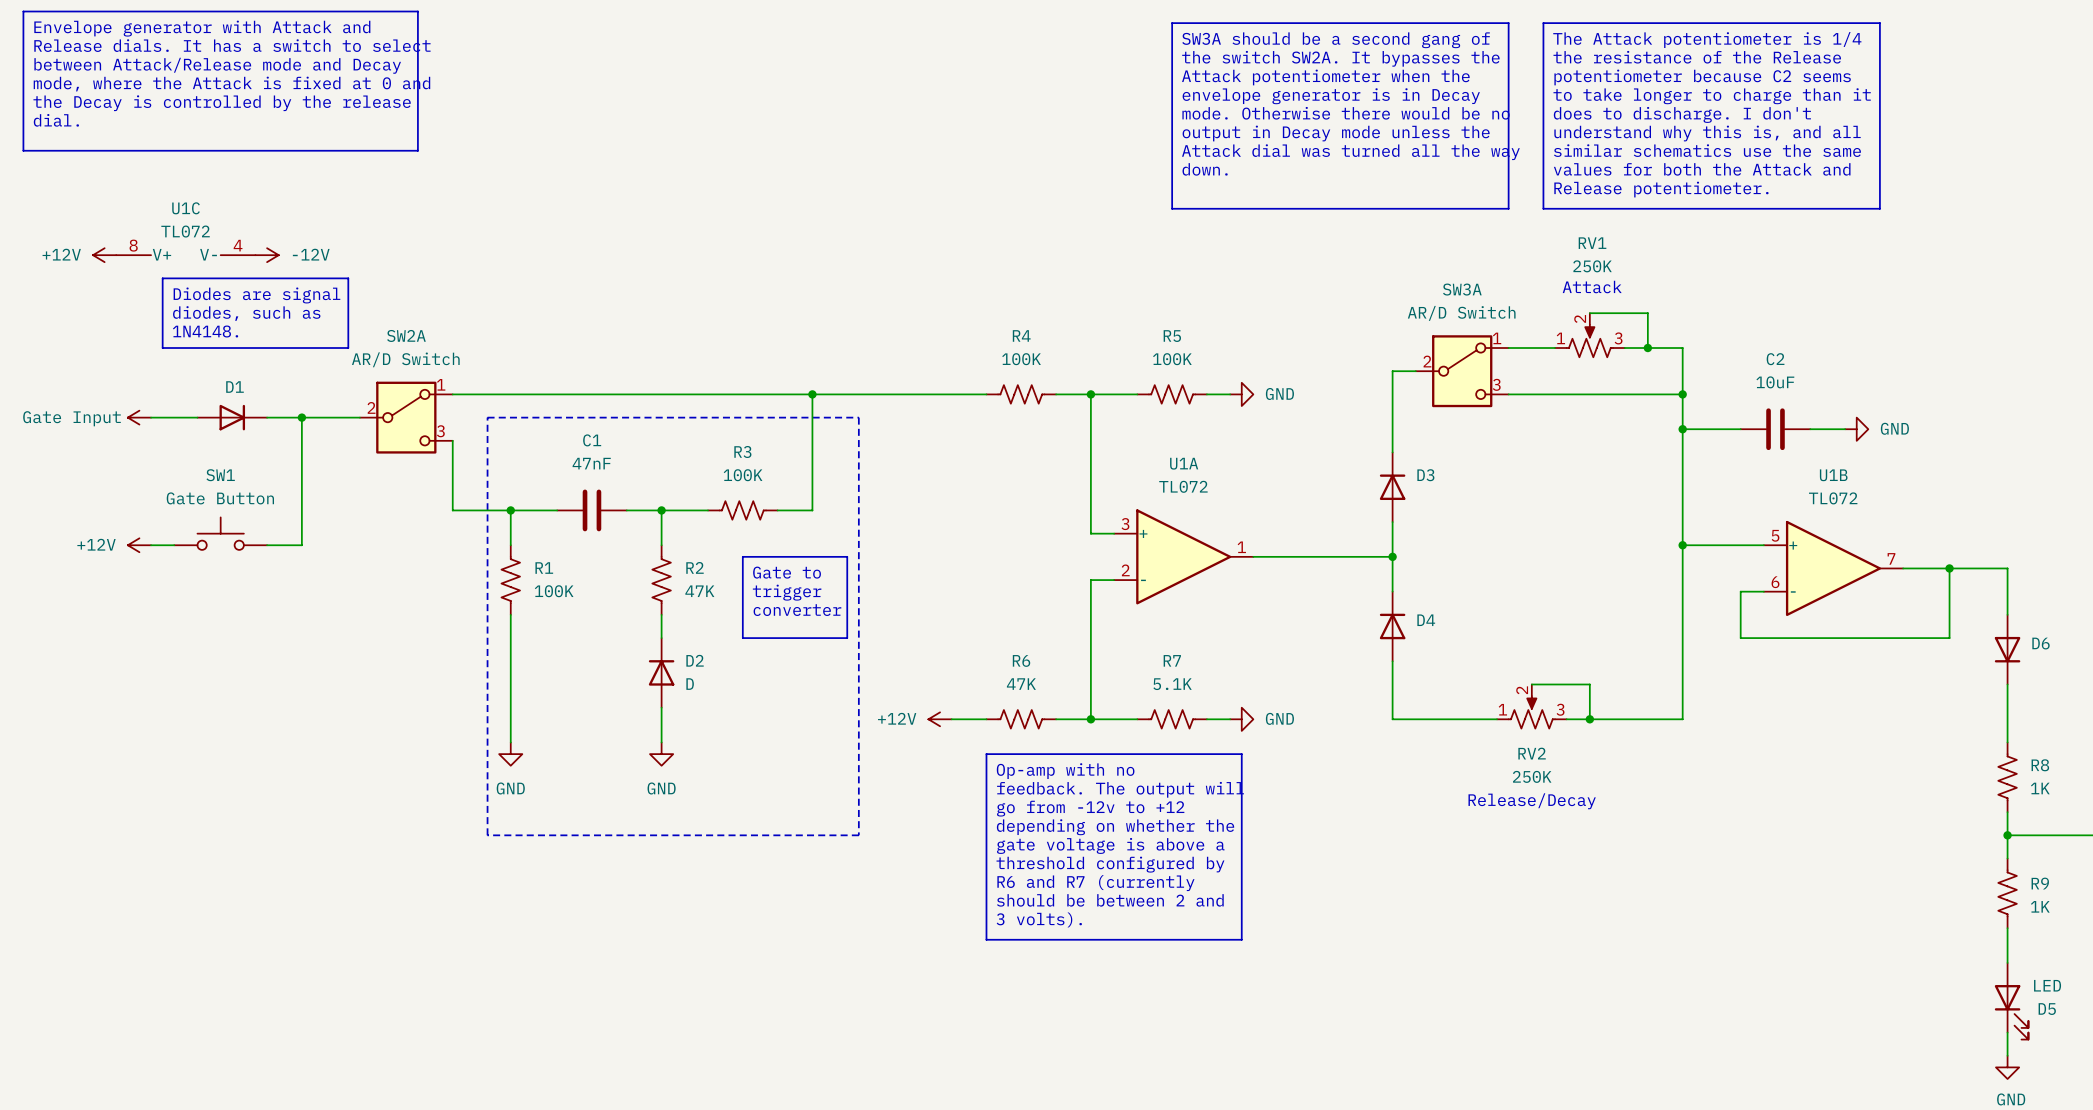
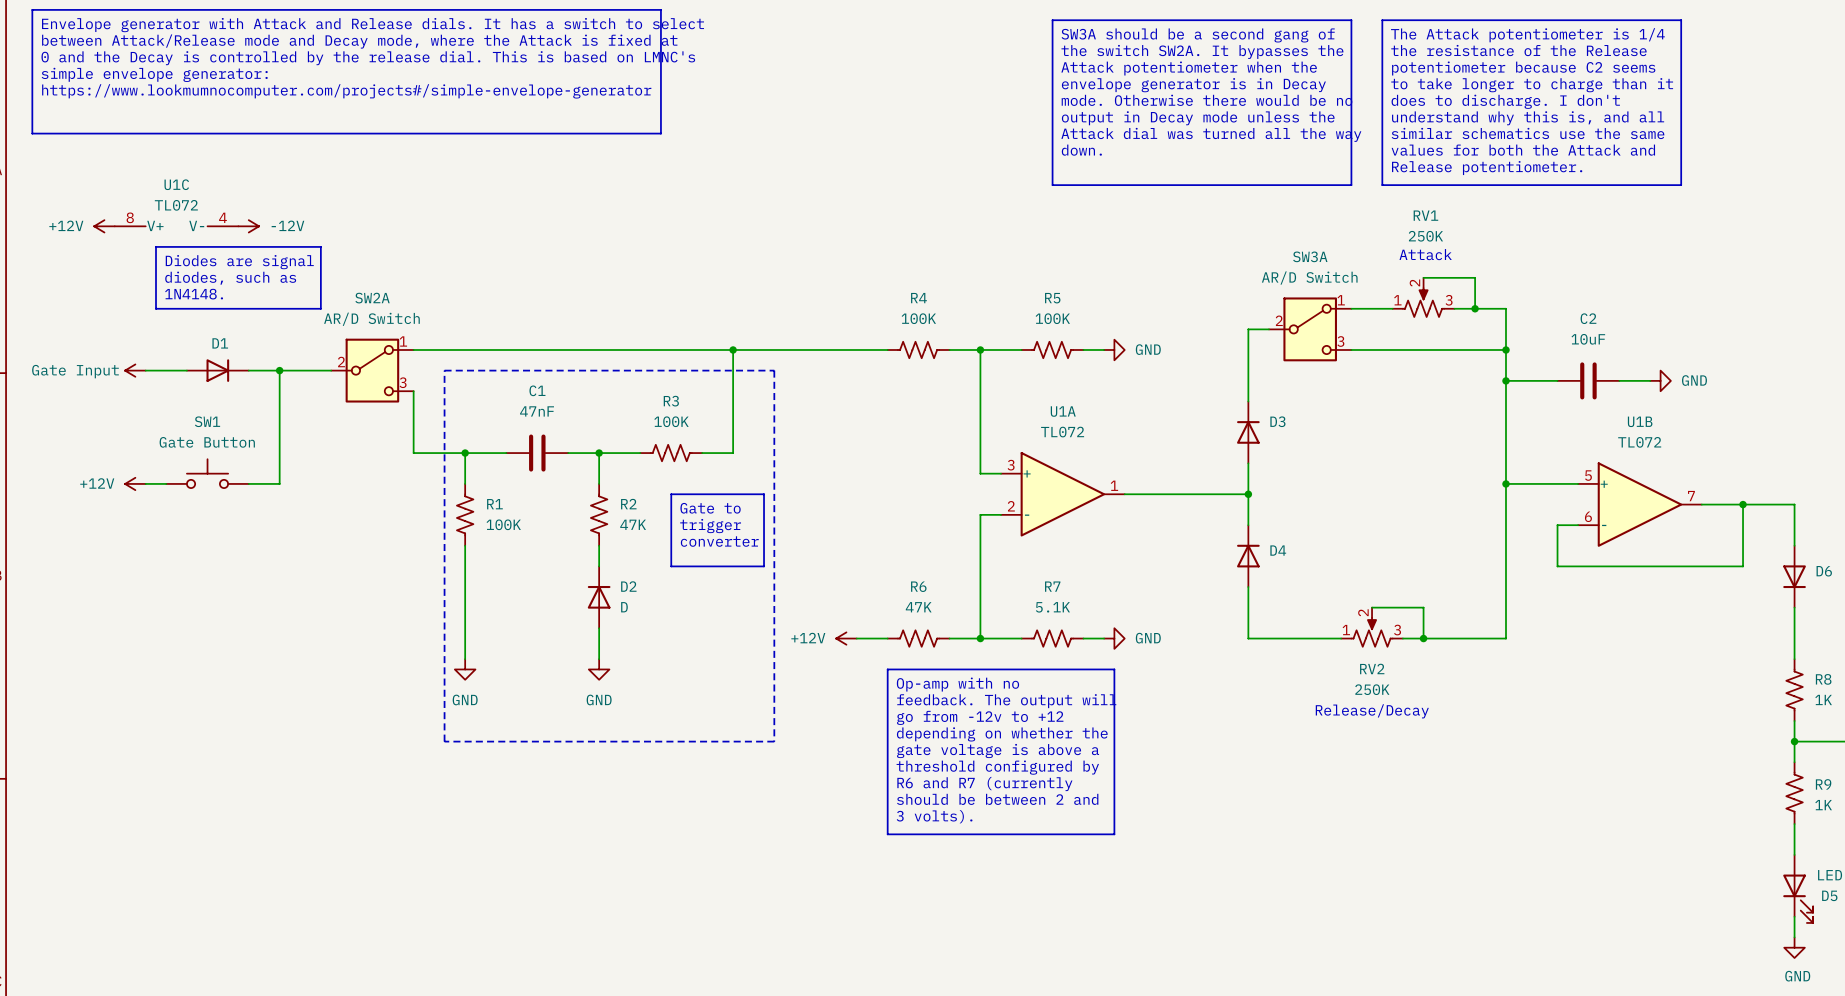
line: (417, 11) (417, 150) -> (382, 9) (660, 9) (660, 133) (382, 133)
text: Envelope generator with Attack and (202, 28) -> Envelope generator with Attack and Release dials. It has a switch to select (373, 25)
text: Release dials. It has a switch to select (232, 45) -> between Attack/Release mode and Decay mode, where the Attack is fixed at (359, 41)
text: between Attack/Release mode and Decay (217, 65) -> 0 and the Decay is controlled by the release dial. This is based on LMNC's (368, 58)
text: mode, where the Attack is fixed at 0 and (231, 84) -> simple envelope generator: (154, 74)
text: the Decay is controlled by the release (222, 103) -> https://www.lookmumnocomputer.com/projects#/simple-envelope-generator (346, 91)
text: dial. (56, 120) -> none

